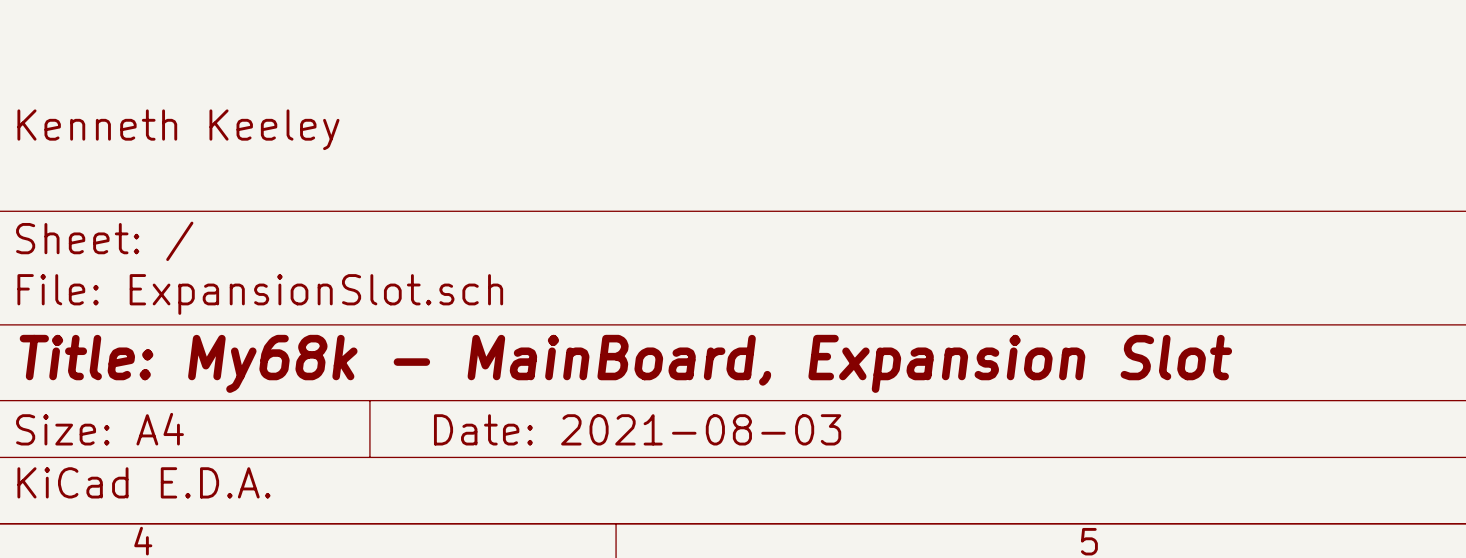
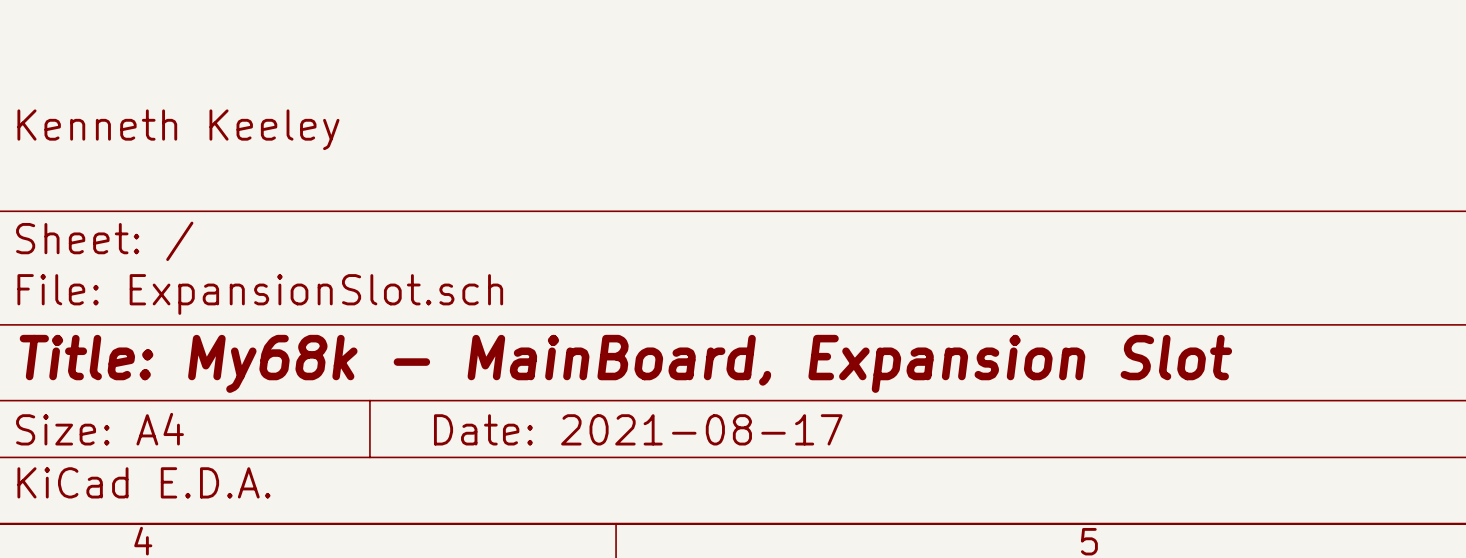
title block: Date: 2021-08-03 (637, 429) -> Date: 2021-08-17 (638, 429)

